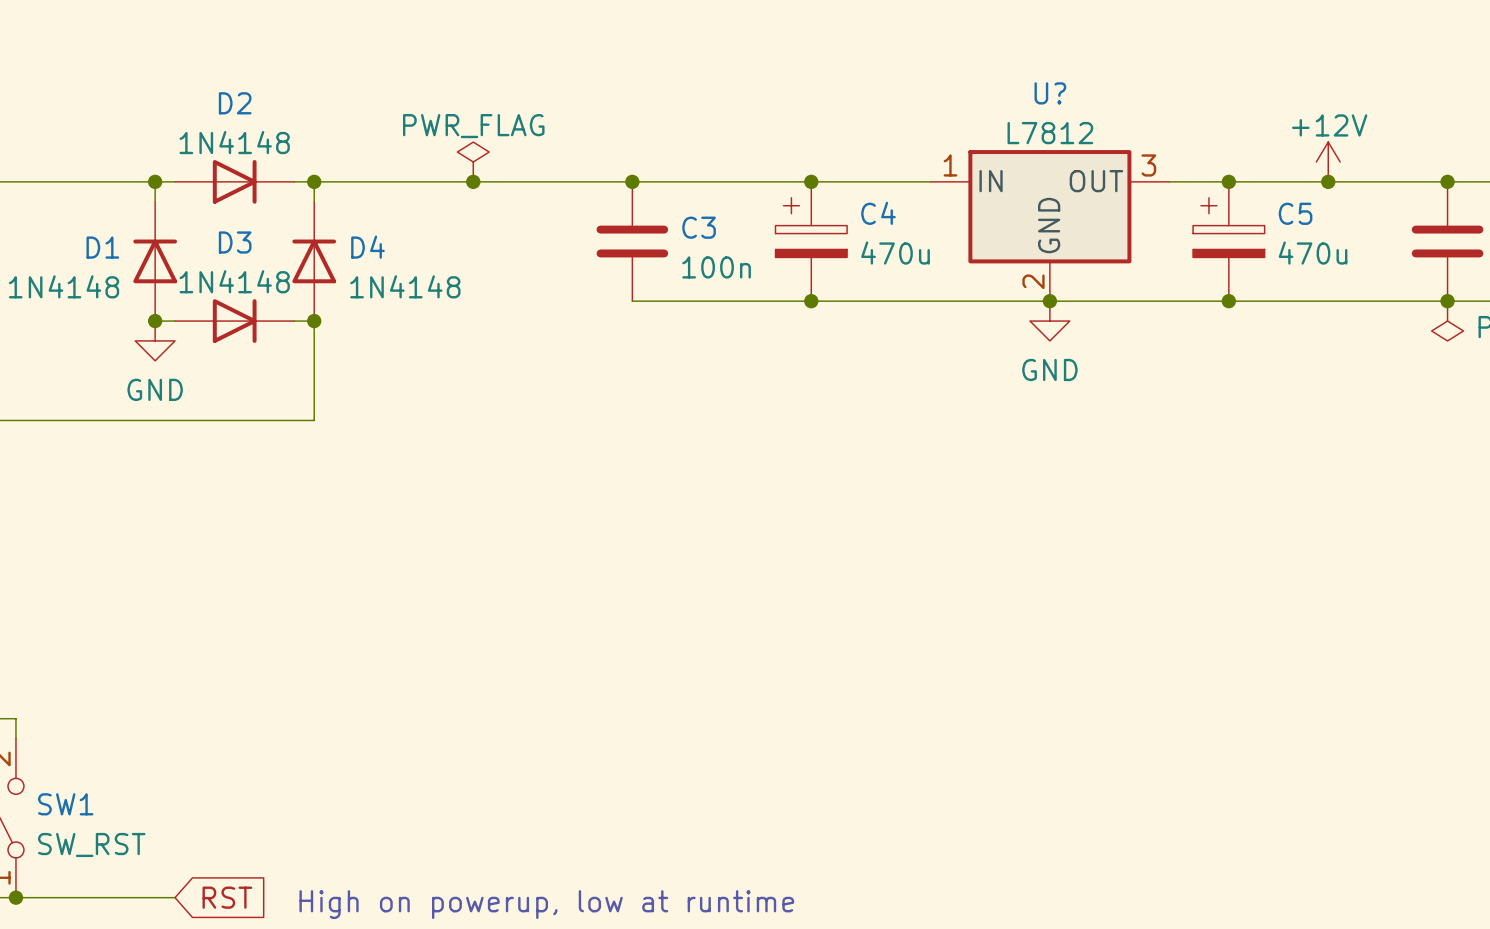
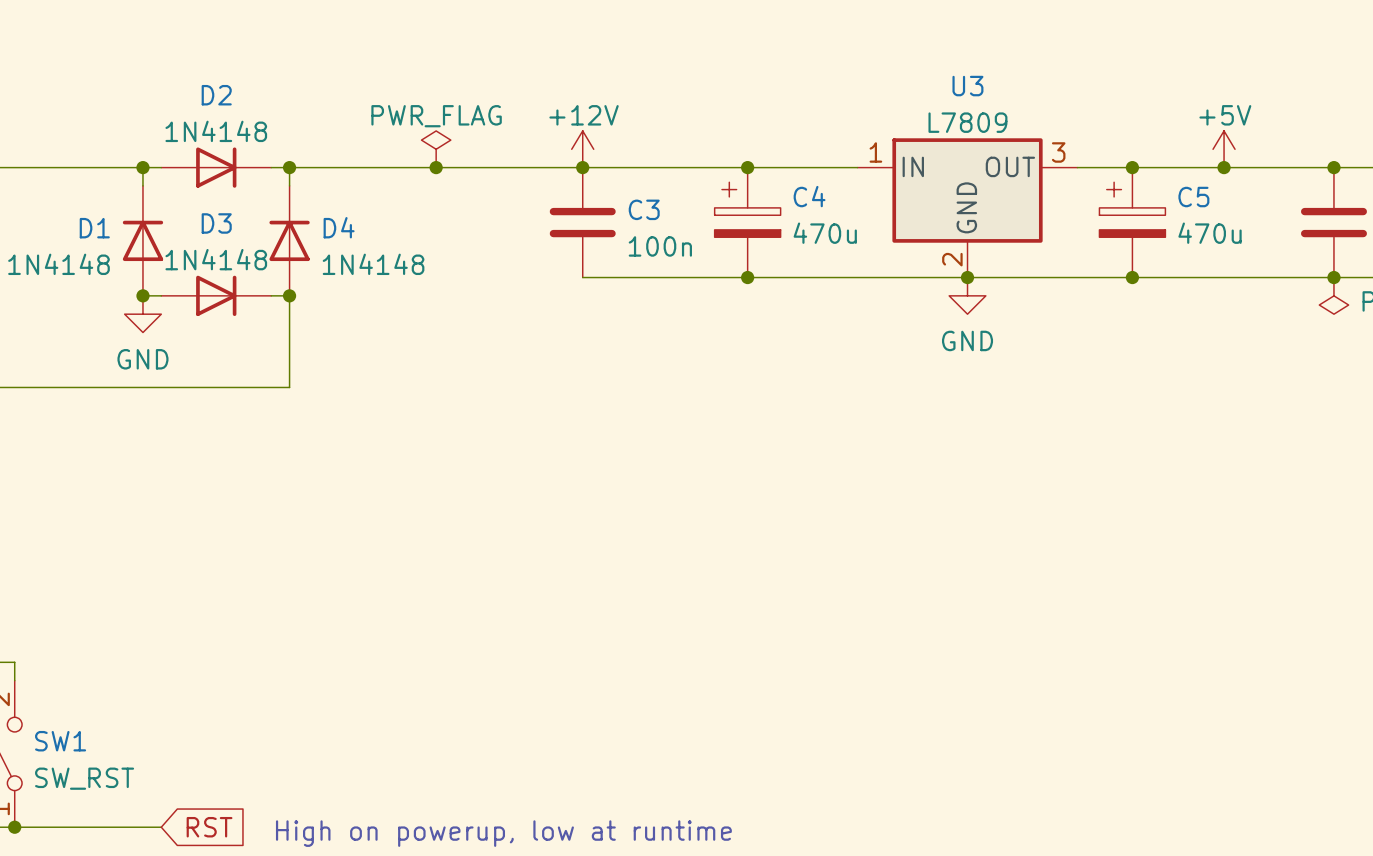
U? name: U? (1050, 93) -> U3 (967, 86)
U? value: L7812 (1050, 133) -> L7809 (967, 122)
power symbol: none -> +12V (582, 149)
power symbol: +12V (1328, 161) -> +5V (1224, 149)

